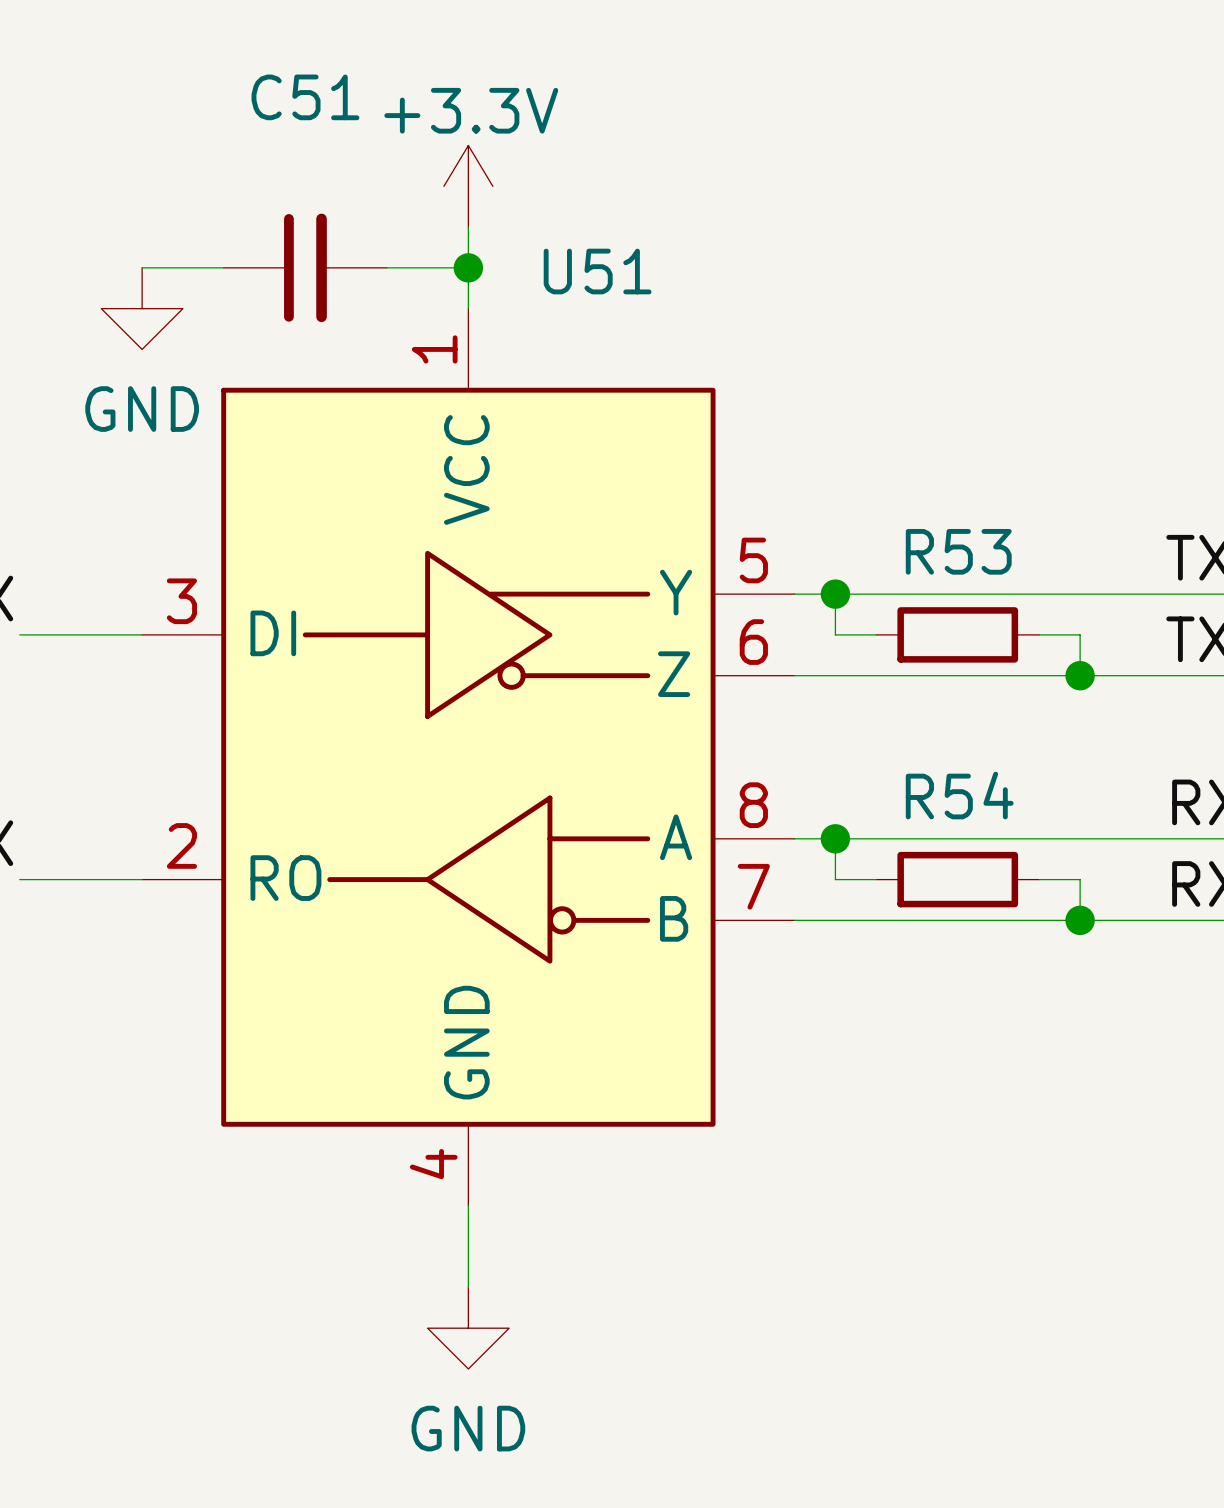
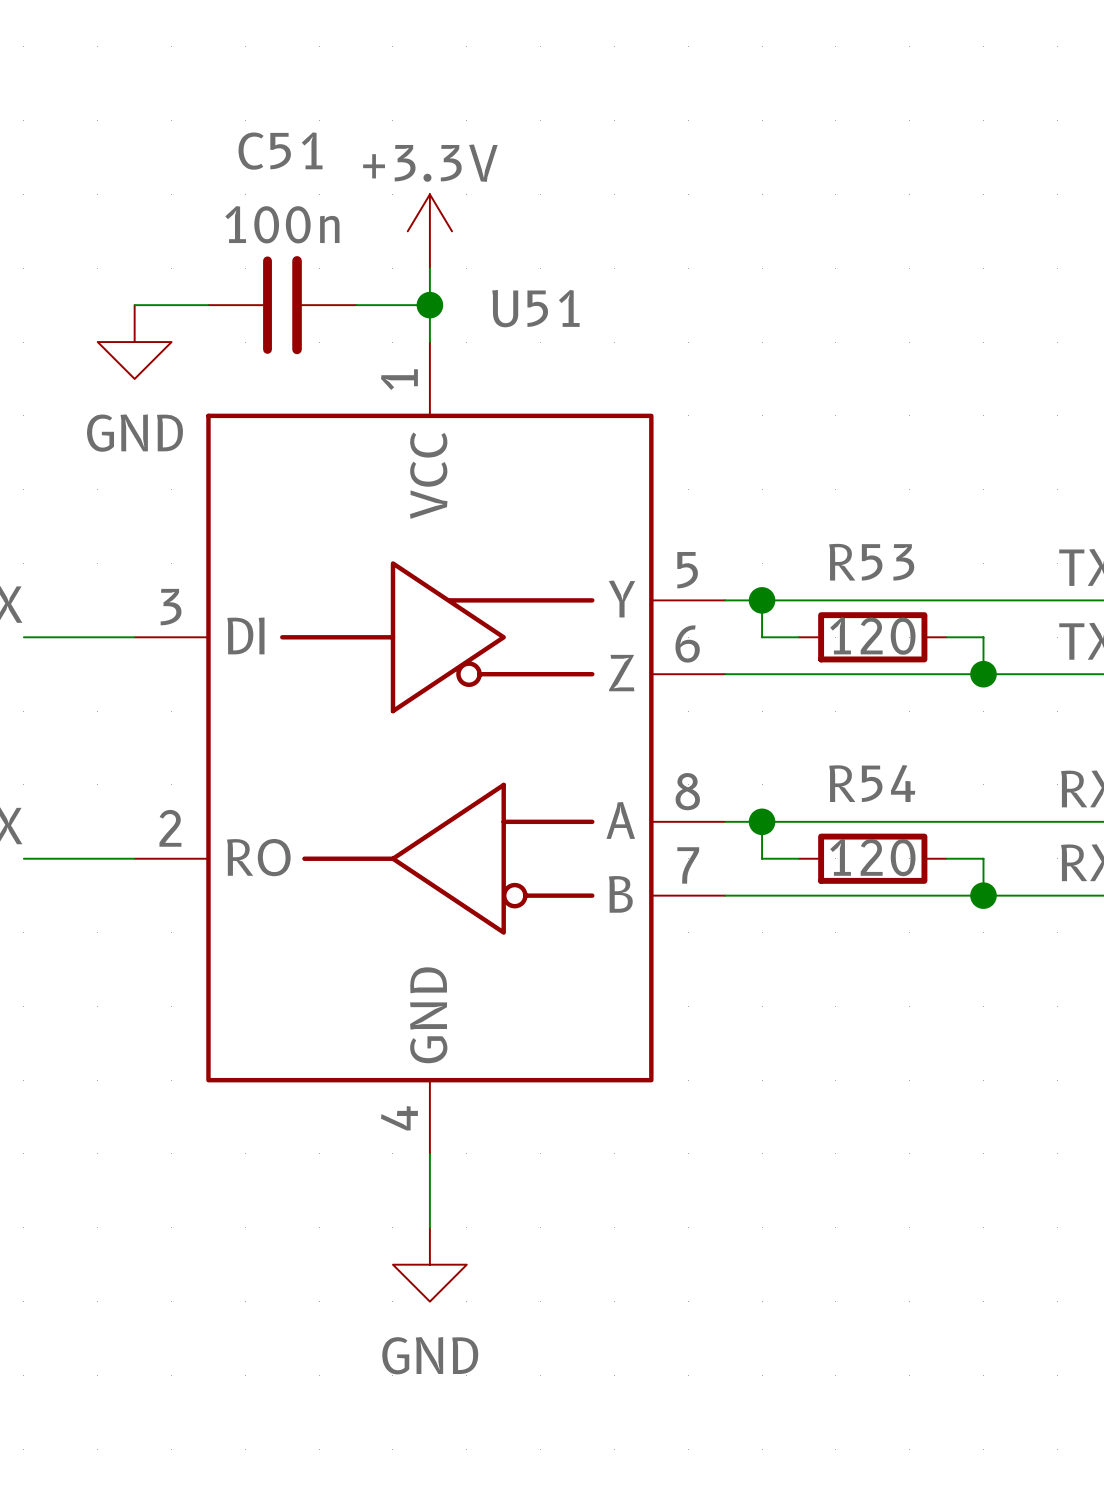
C51 value: none -> 100n (282, 224)
R53 value: none -> 120 (872, 636)
R54 value: none -> 120 (872, 857)

